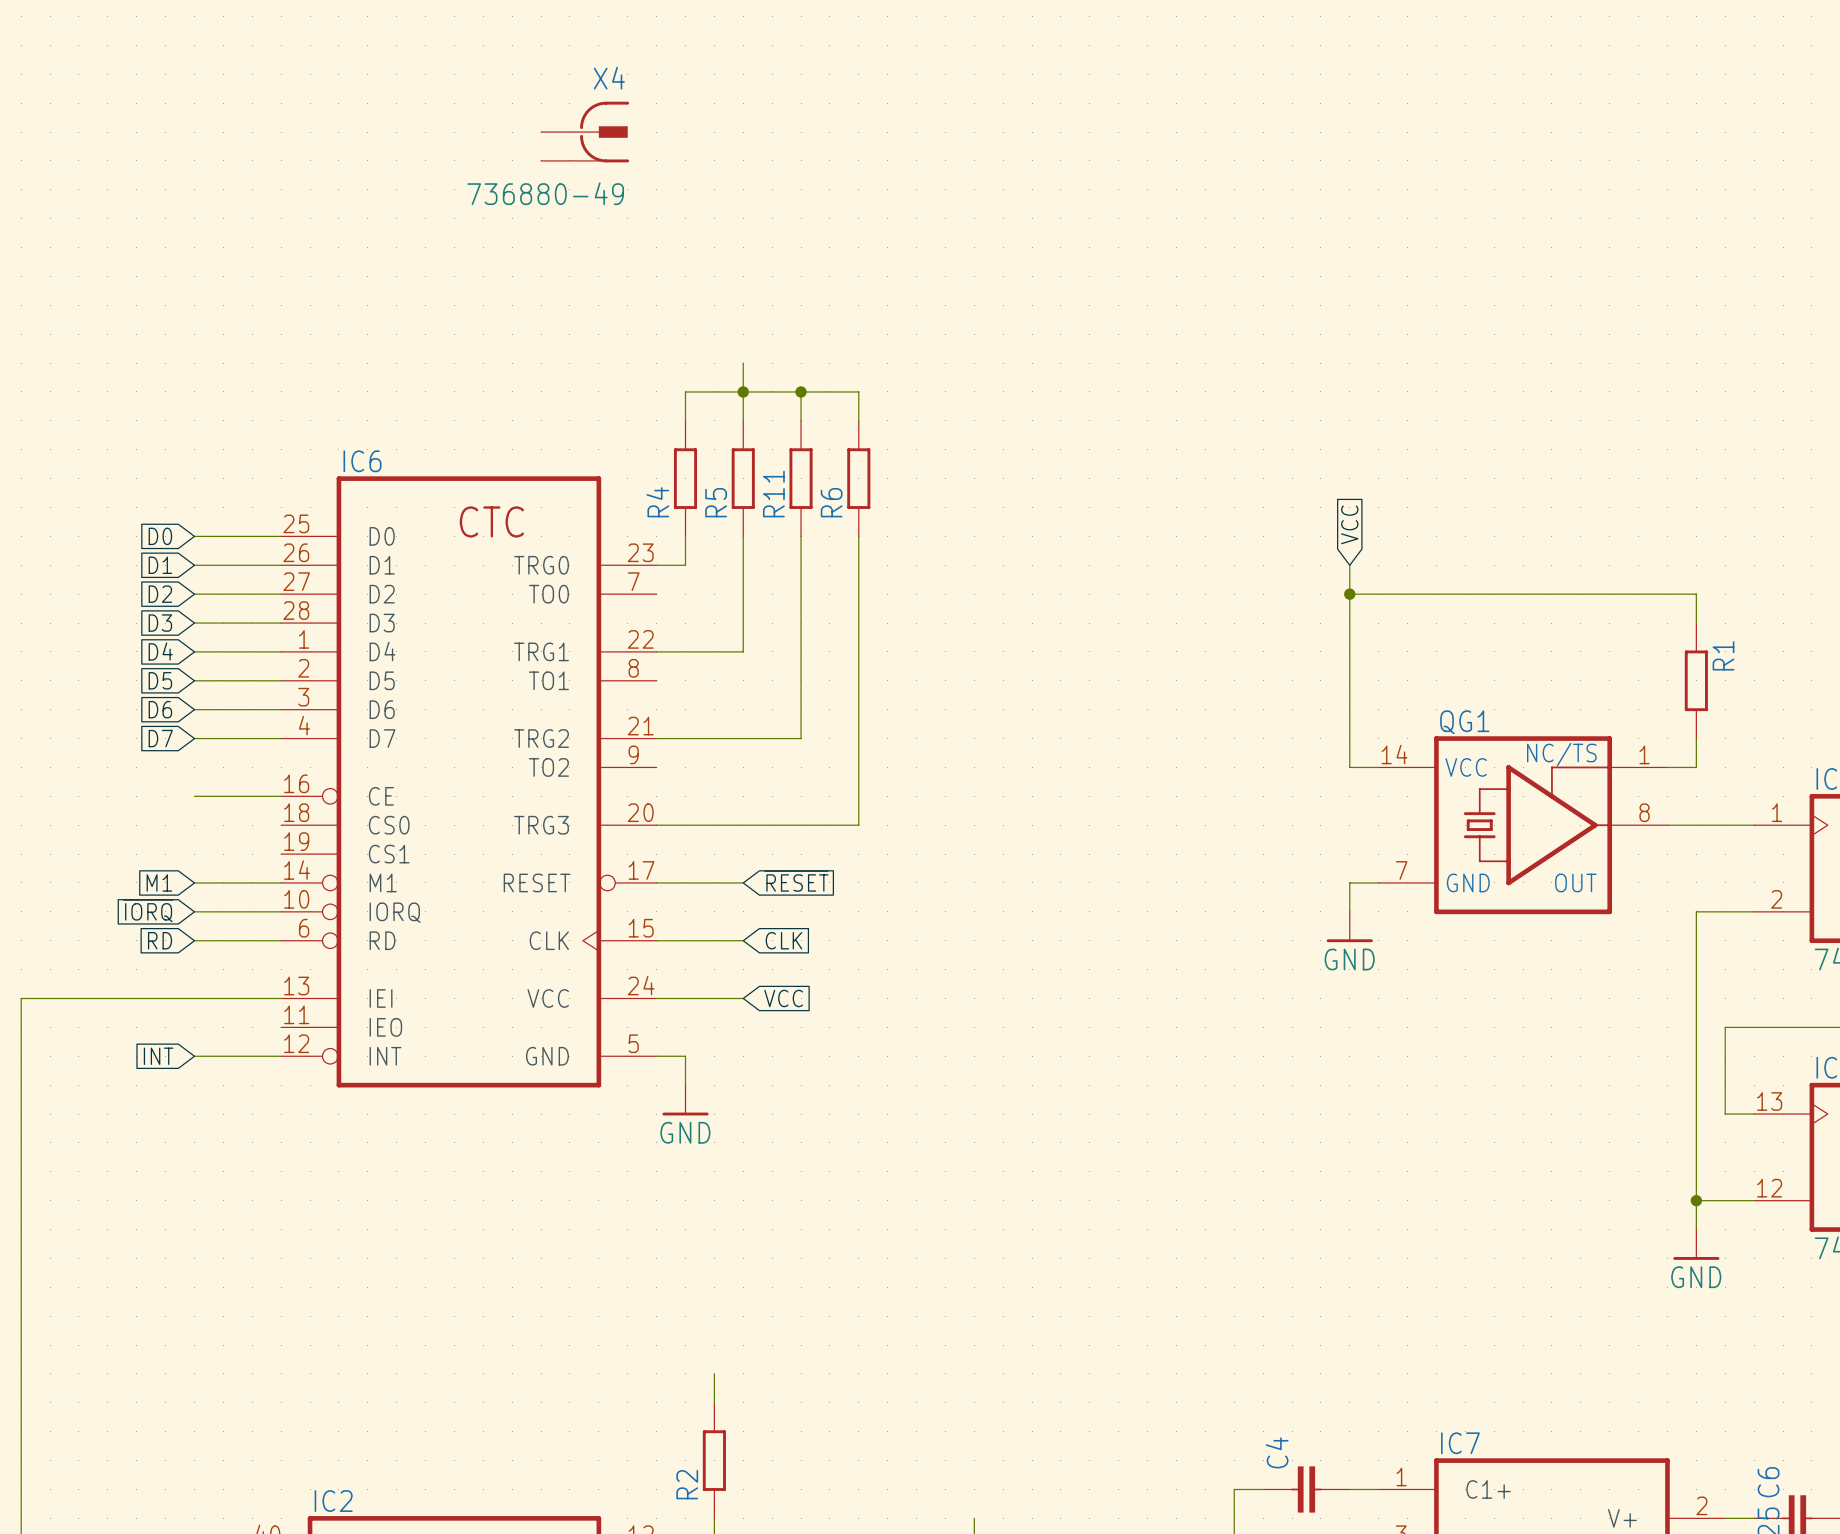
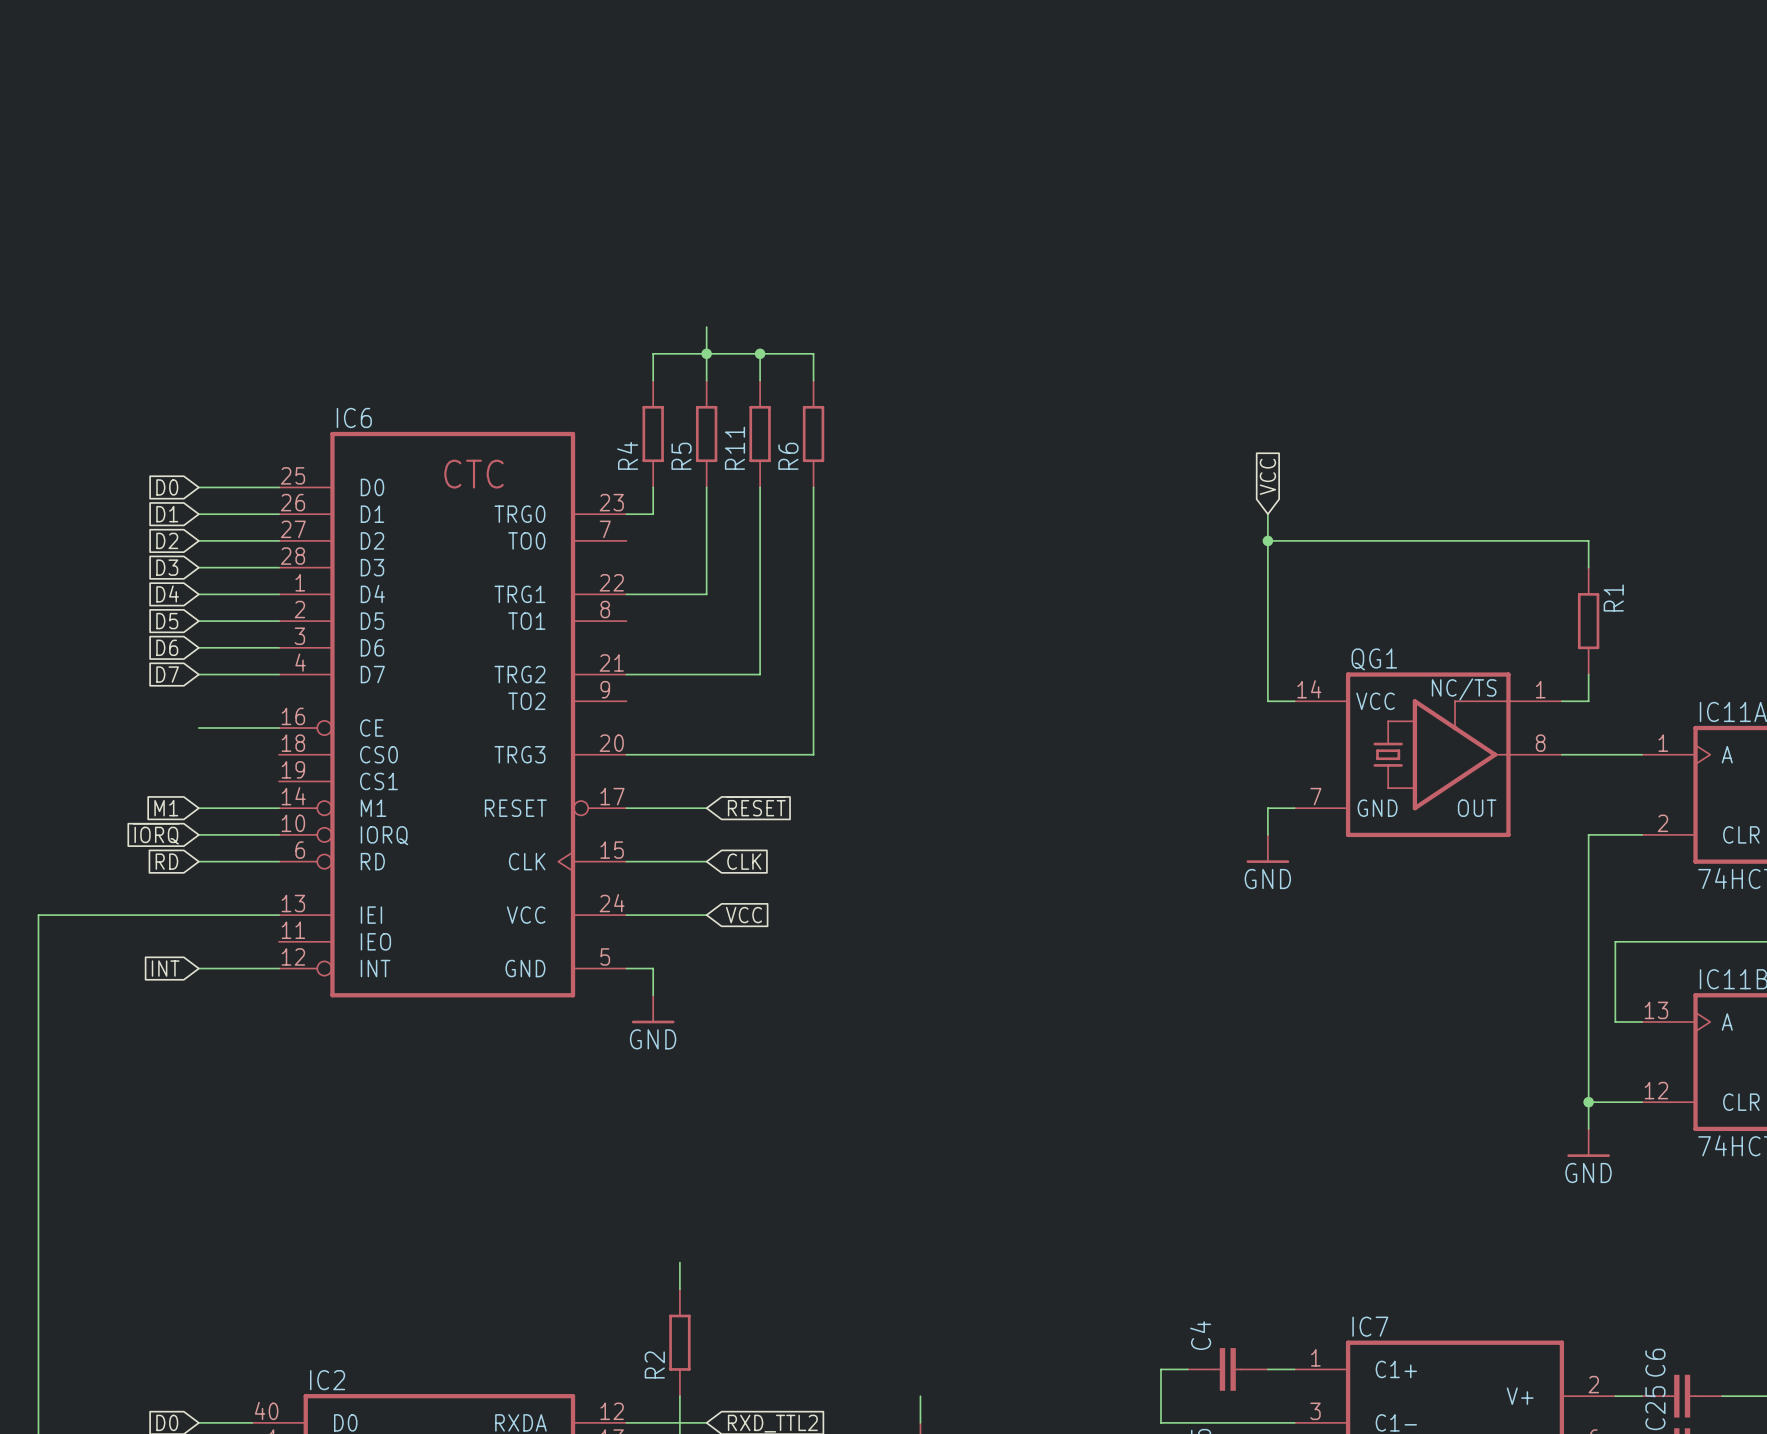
X4: 736880-49 (585, 132) -> none

